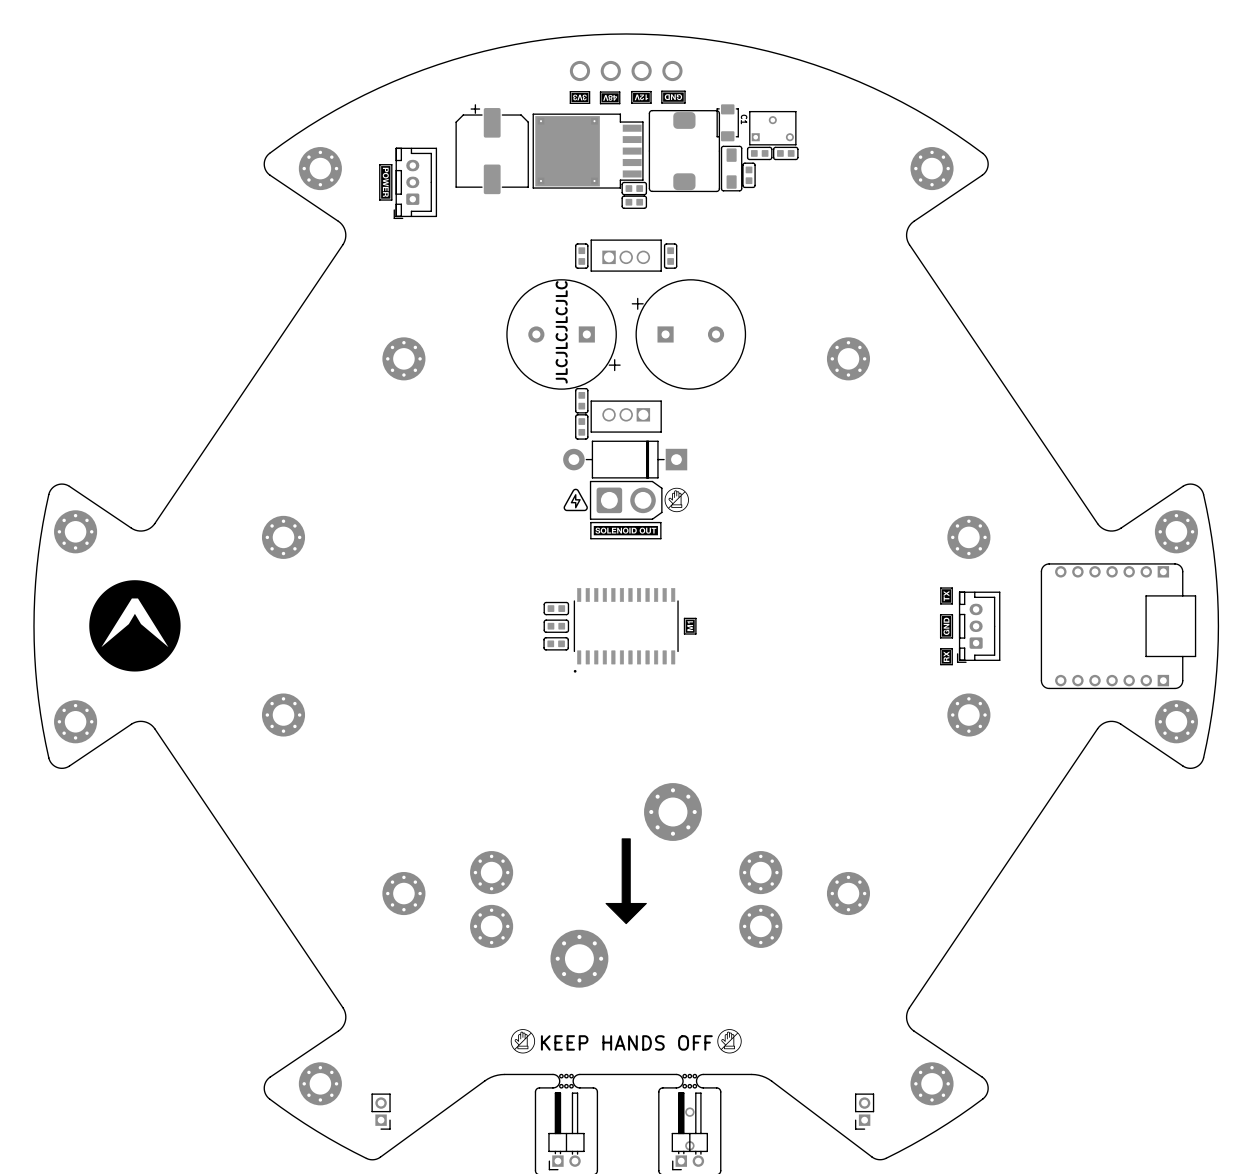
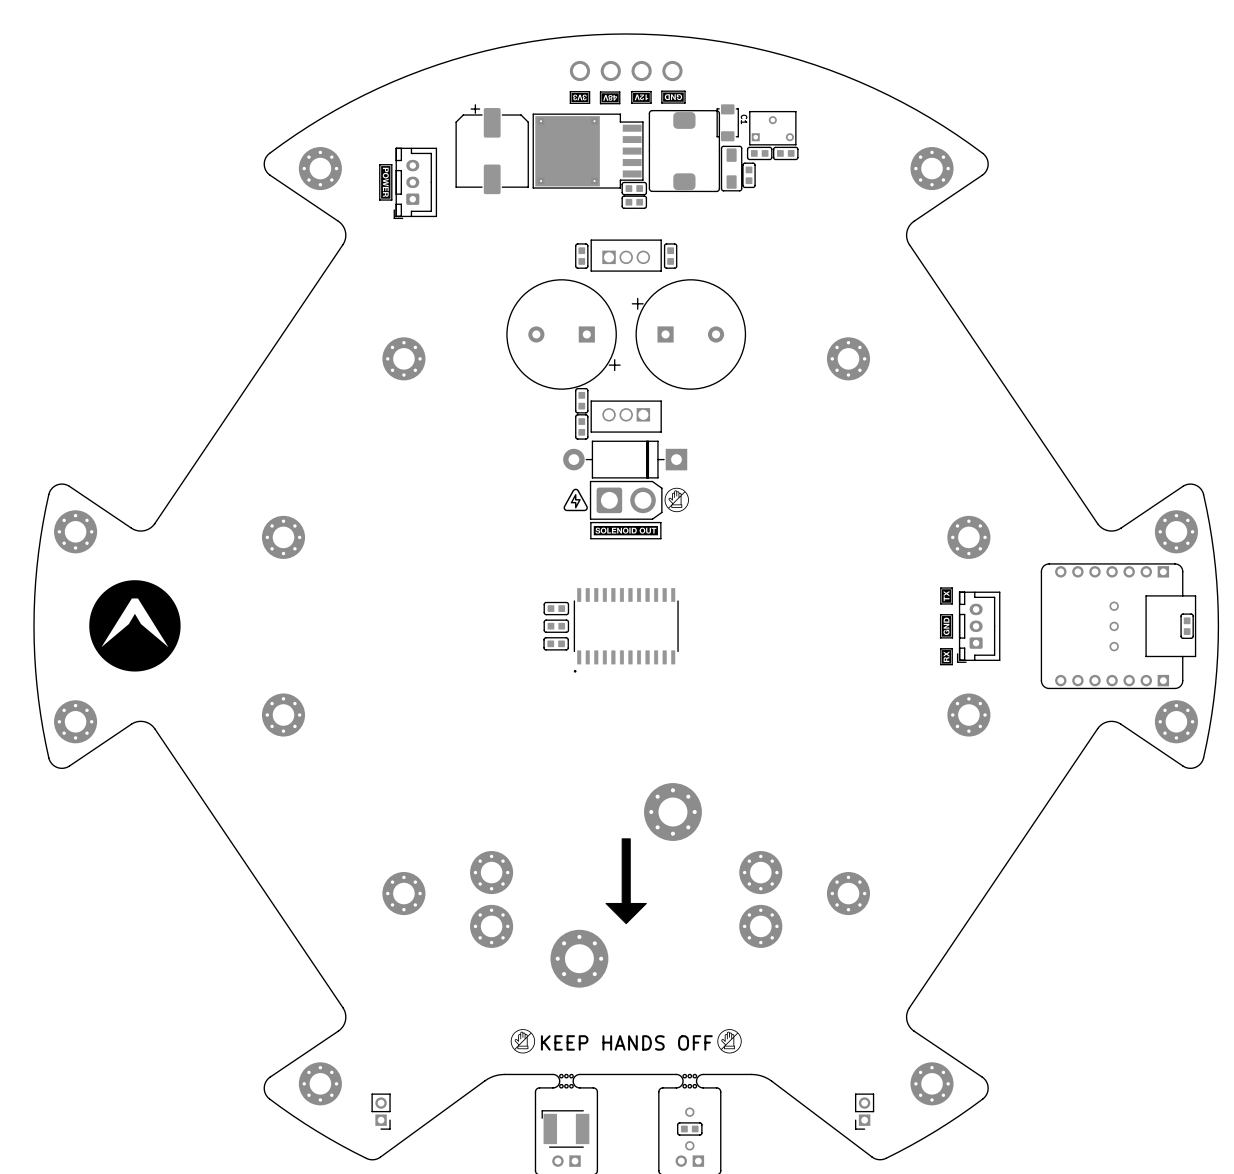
text: JLCJLCJLCJLC (561, 332) -> none
line: (684, 618) (695, 618) (695, 634) (684, 634) (684, 618) -> none
drawing: [685, 619, 695, 633] -> none
part: none -> (1114, 626)
part: none -> (1187, 626)
part footprint: [548, 1092, 585, 1171] -> [541, 1110, 590, 1148]
part footprint: [671, 1092, 708, 1171] -> [677, 1122, 703, 1136]
part: none -> (566, 1161)
part: none -> (689, 1161)

